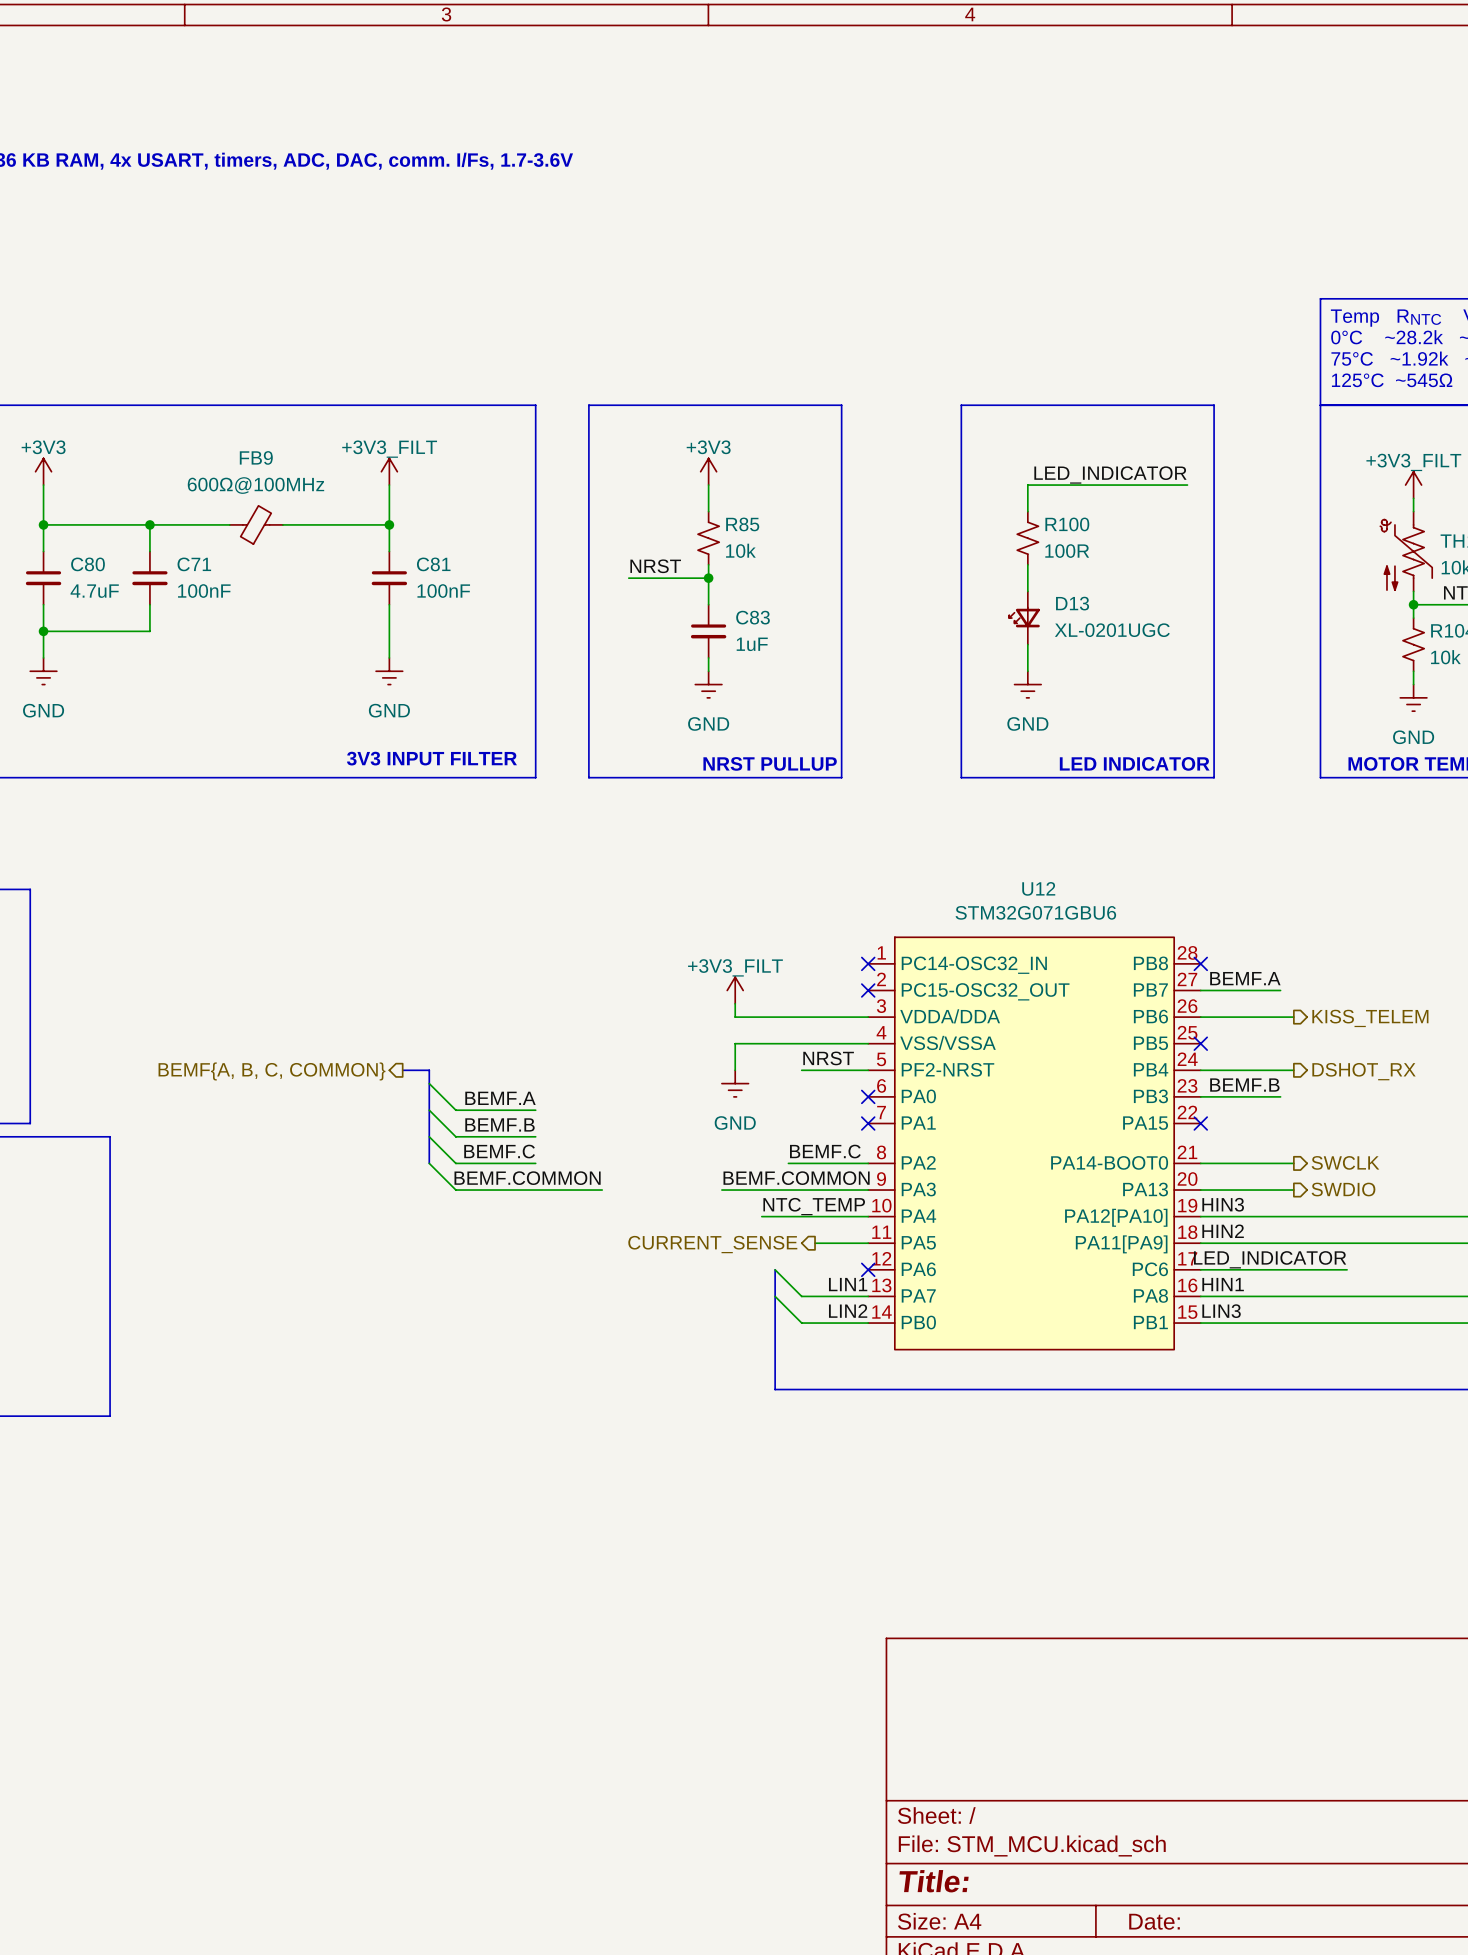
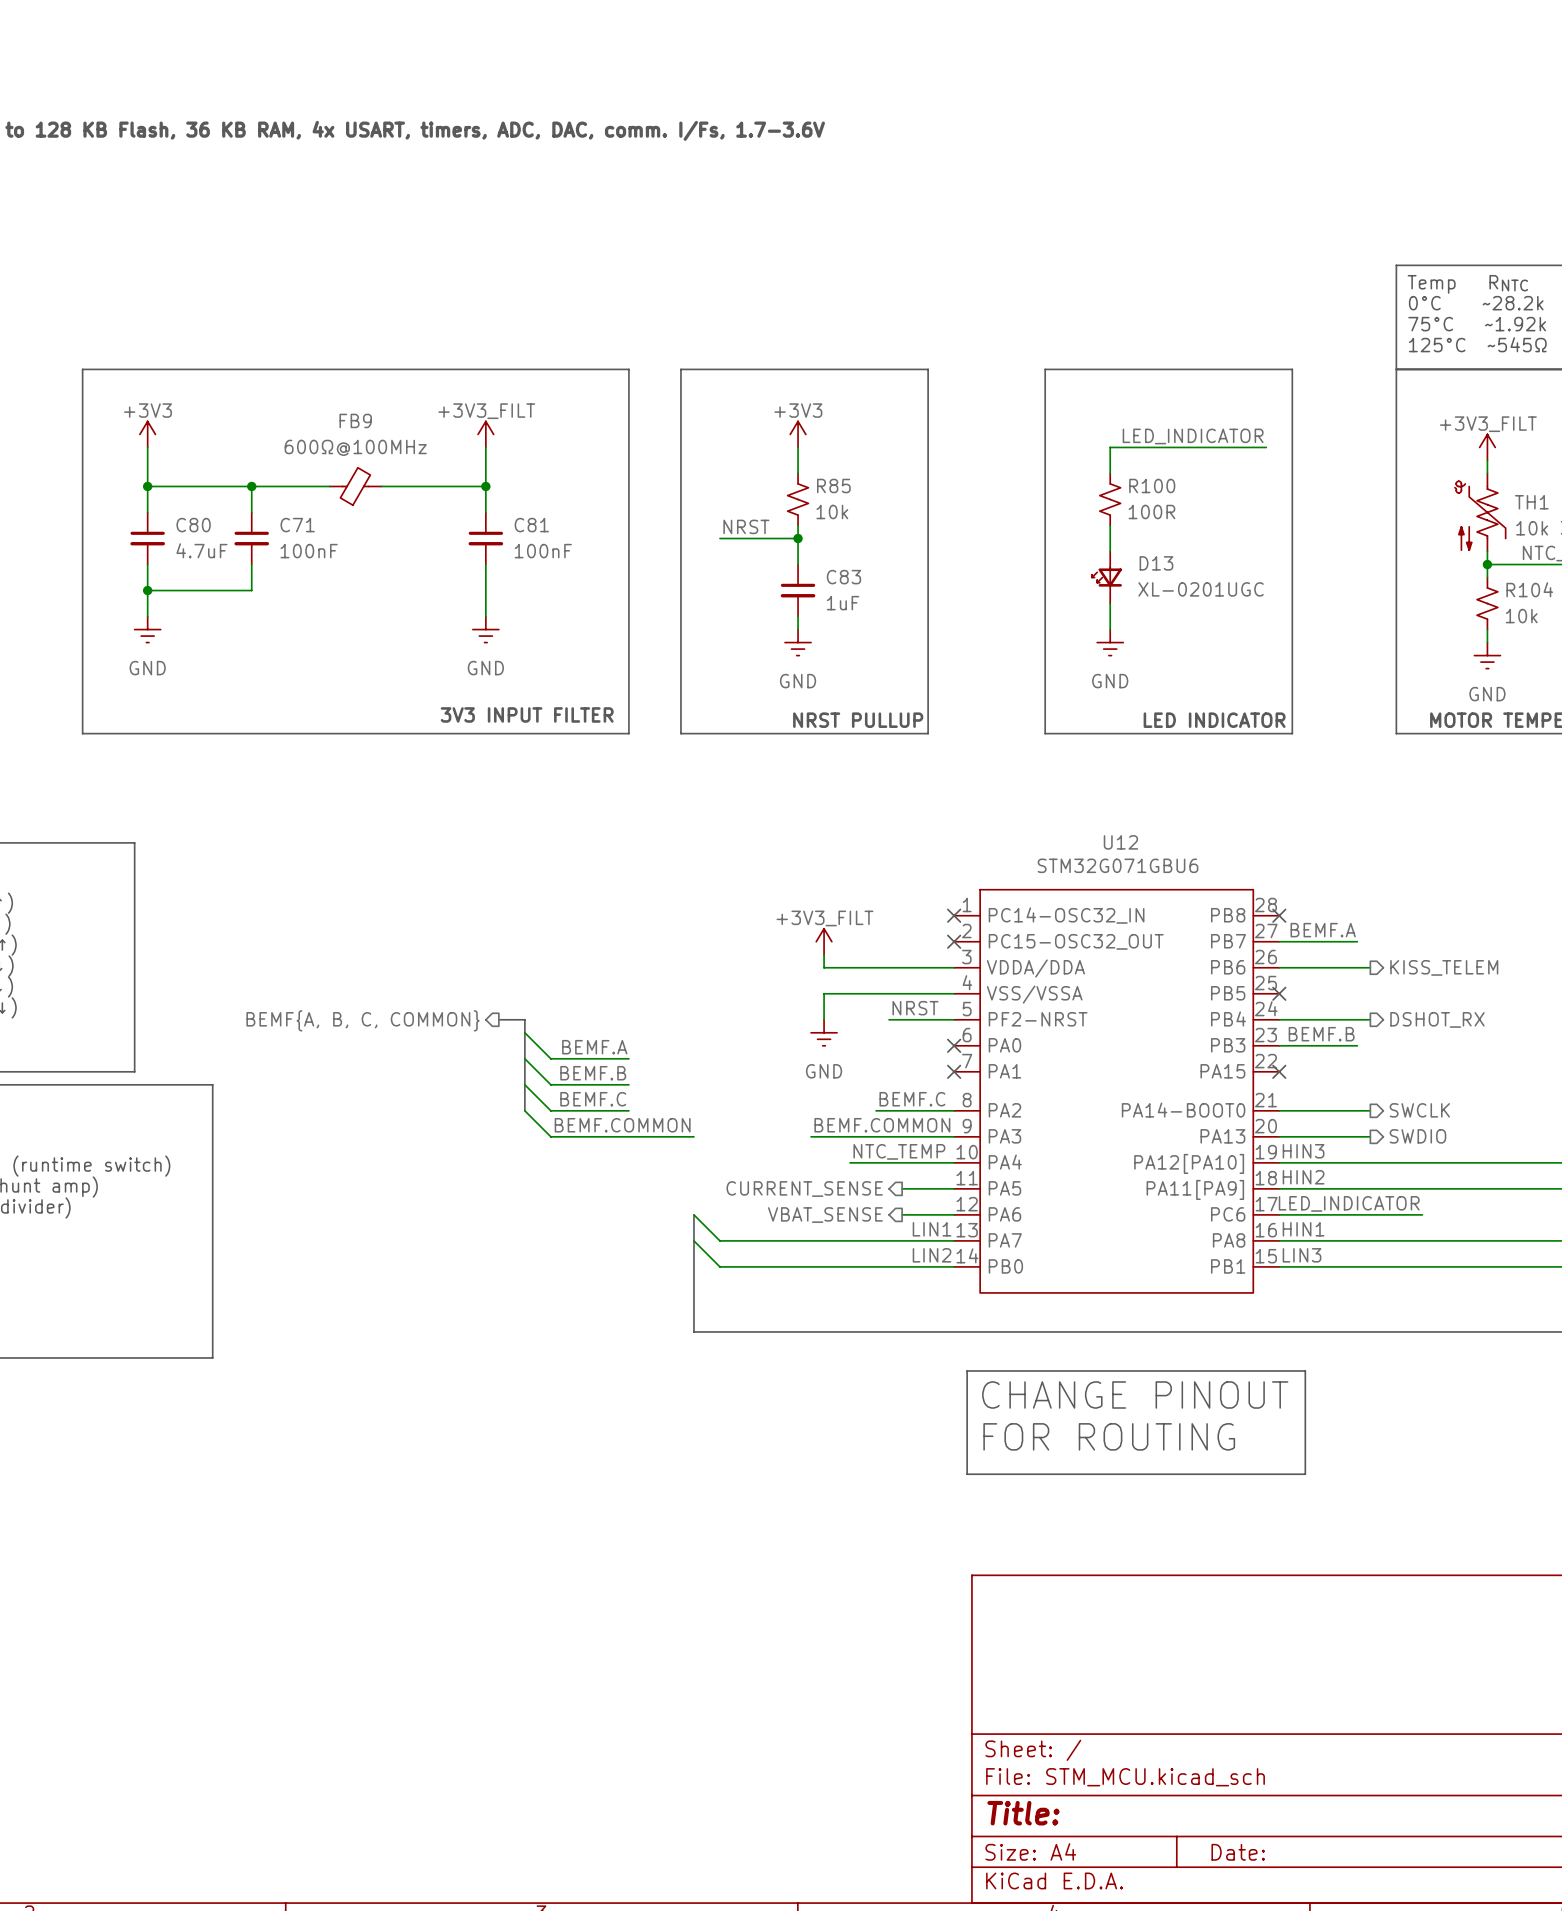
wire: (775, 1269) (801, 1296) -> (693, 1214) (719, 1240) (889, 1240)
bus: (775, 1269) (775, 1389) -> (693, 1214) (693, 1331) (863, 1331)
wire: none -> (902, 1214) (954, 1214)
no-connect mark: (868, 1269) -> none
hierarchical label: none -> VBAT_SENSE (825, 1215)
wire: (775, 1296) (801, 1323) -> (693, 1240) (719, 1266) (889, 1266)
line: none -> (967, 1370) (1305, 1370) (1305, 1474) (967, 1474) (967, 1370)
text: none -> CHANGE PINOUT (1135, 1394)
text: none -> FOR ROUTING (1109, 1436)

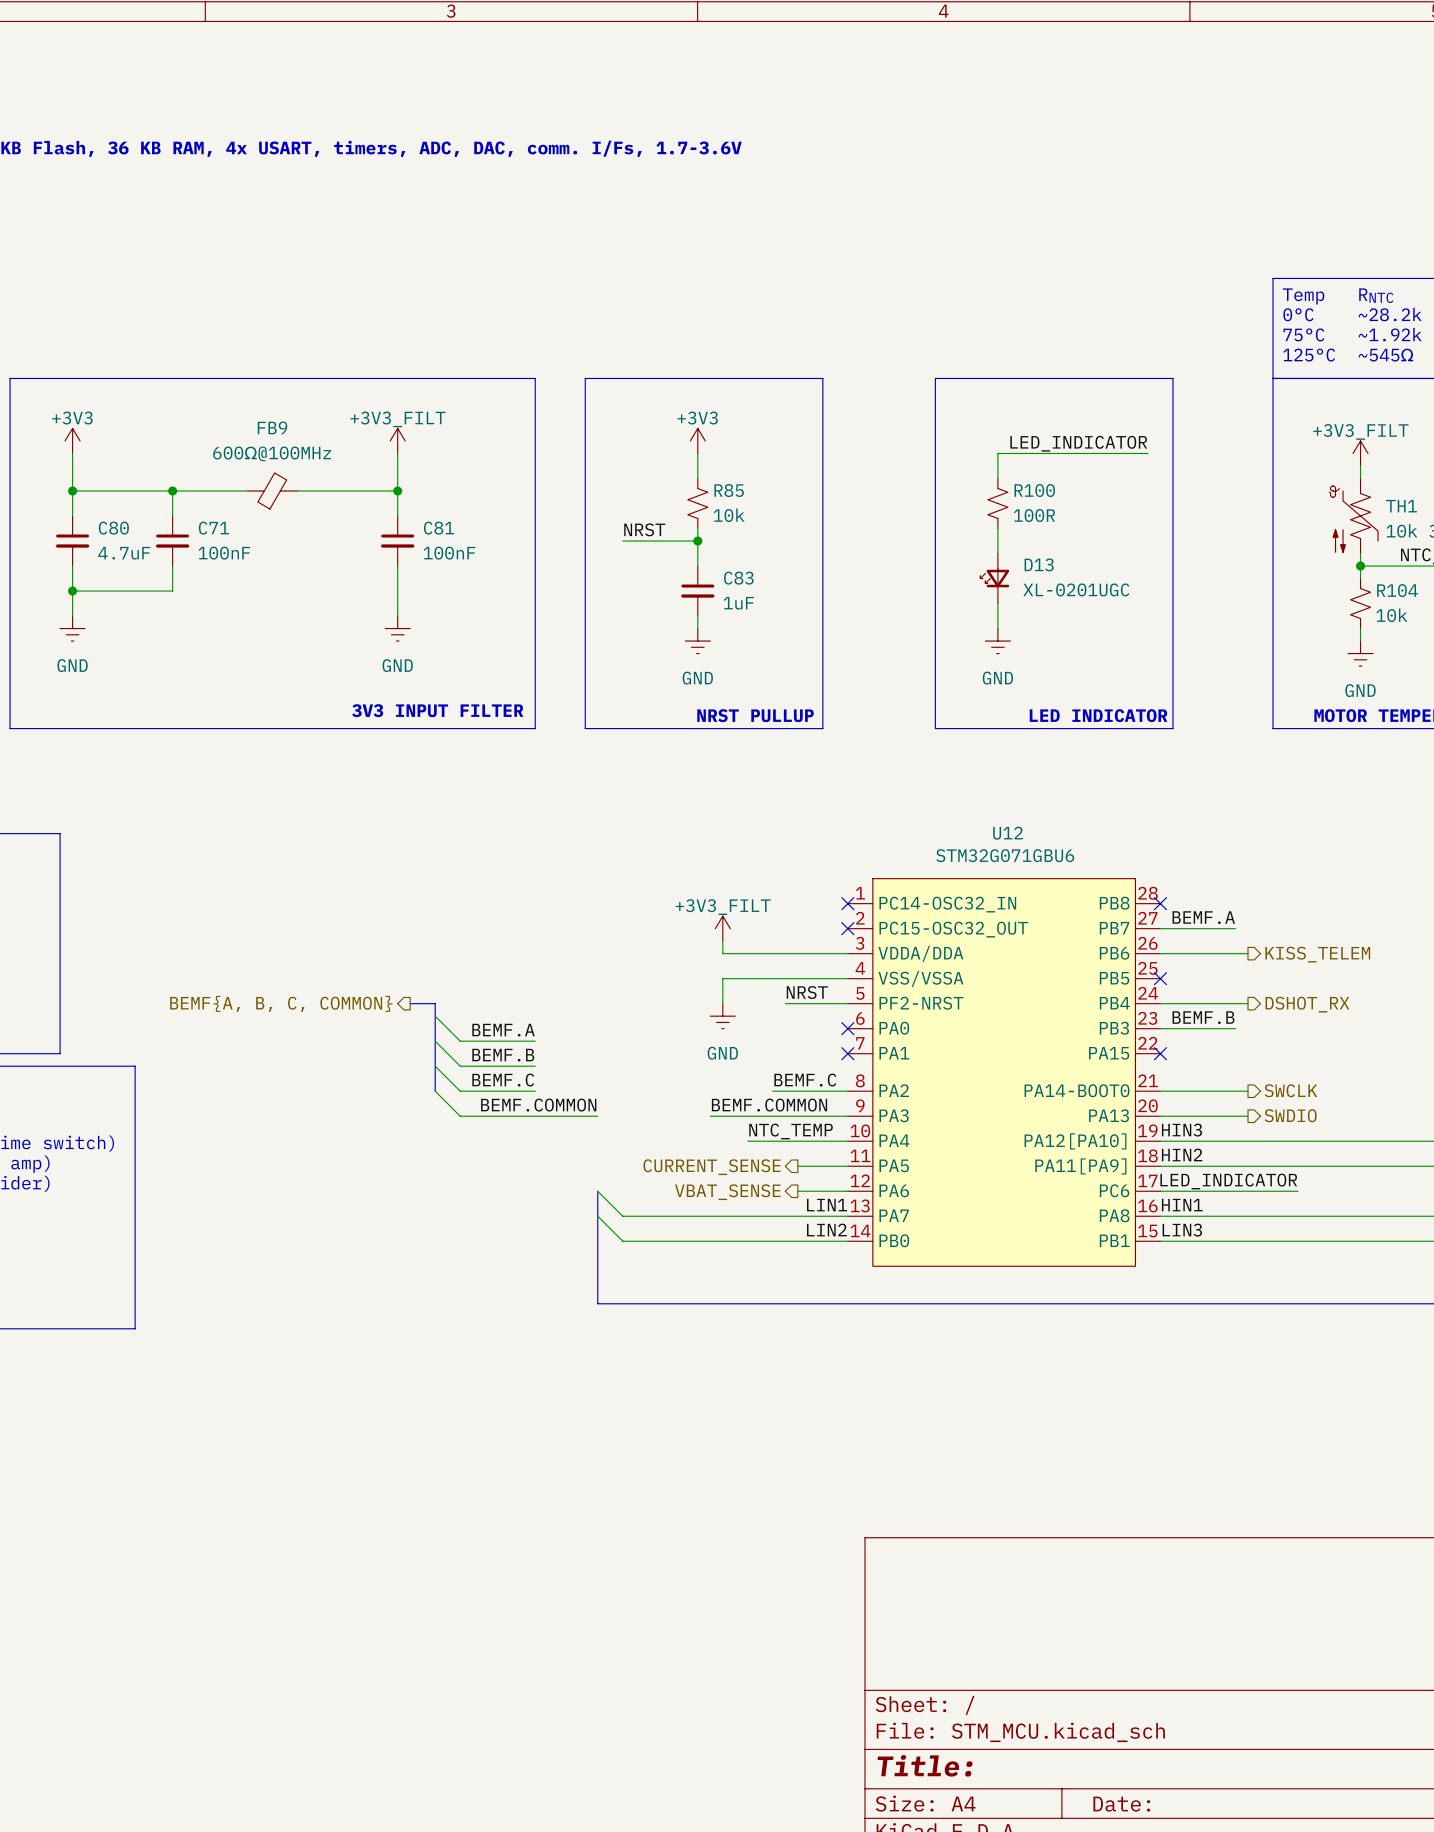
line: (967, 1370) (1305, 1370) (1305, 1474) (967, 1474) (967, 1370) -> none
text: CHANGE PINOUT (1135, 1394) -> none
text: FOR ROUTING (1109, 1436) -> none

